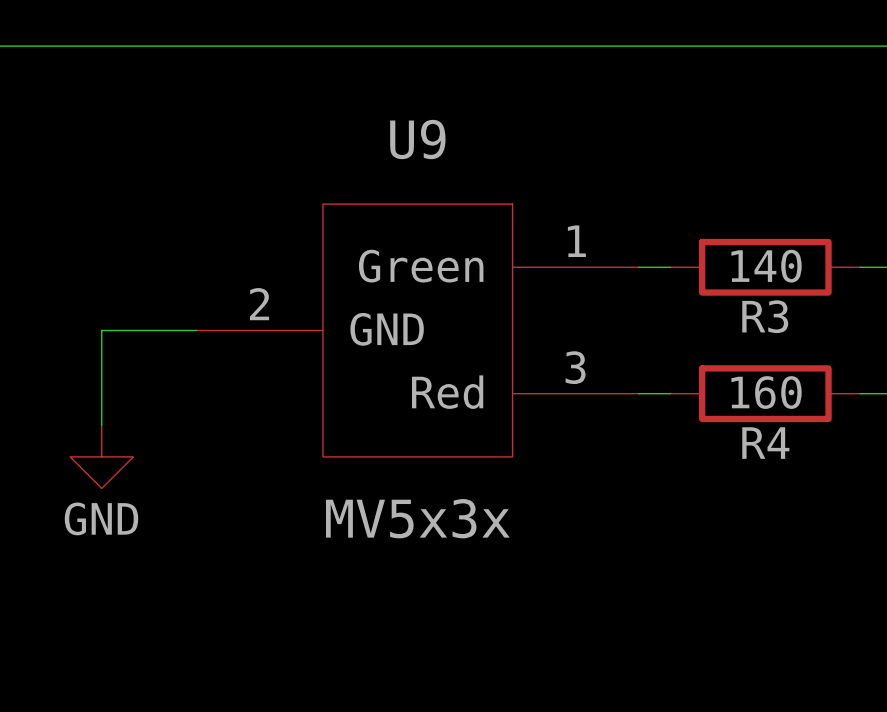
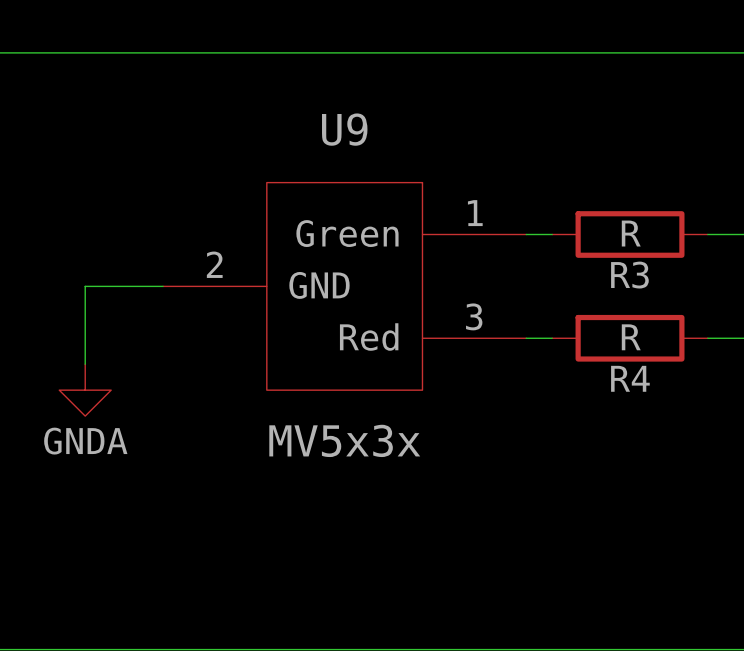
R3 value: 140 (766, 266) -> R (631, 233)
R4 value: 160 (766, 392) -> R (631, 337)
power symbol: GND (101, 456) -> GNDA (85, 390)

